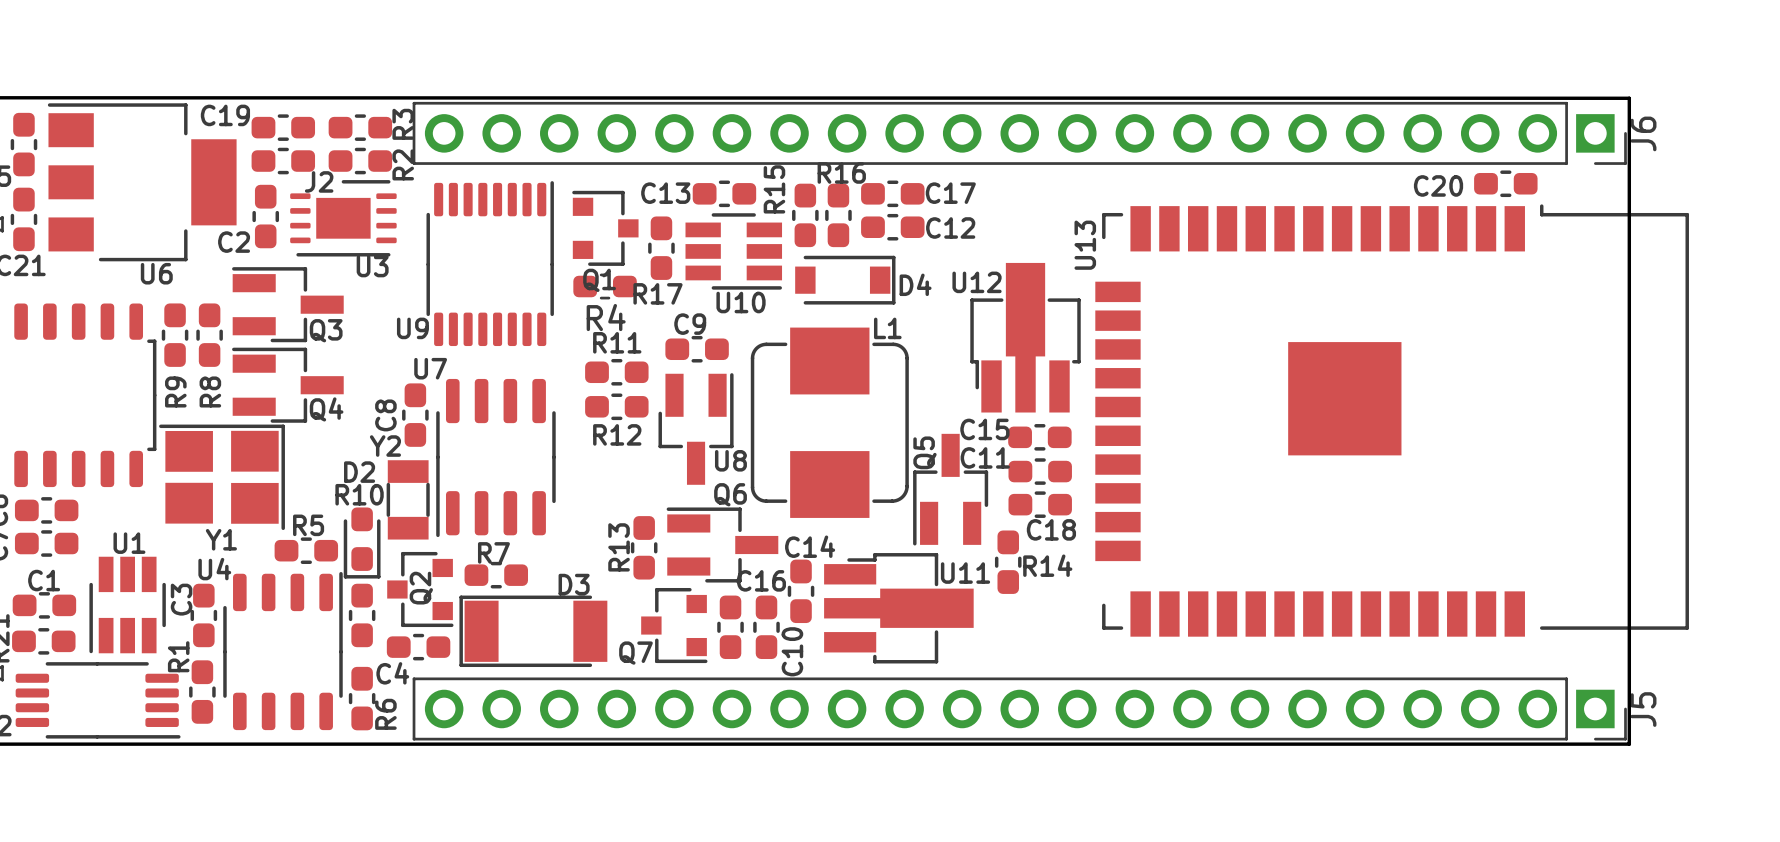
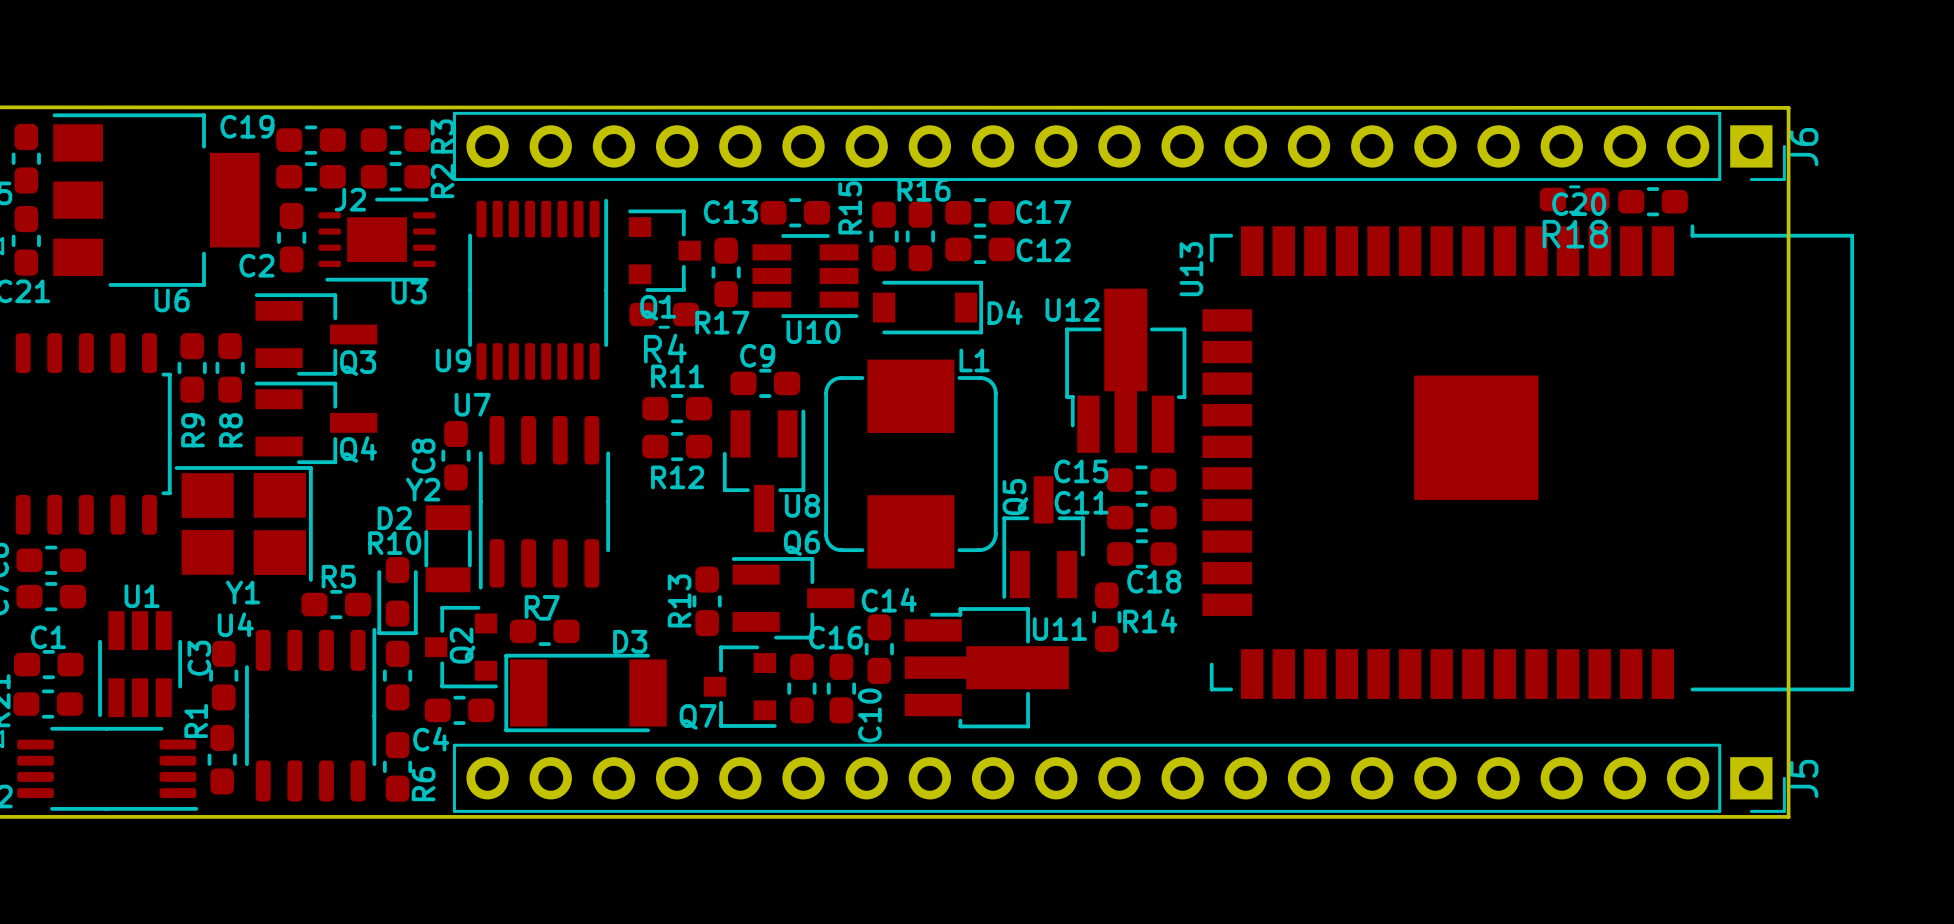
R18: none -> (1574, 199)

